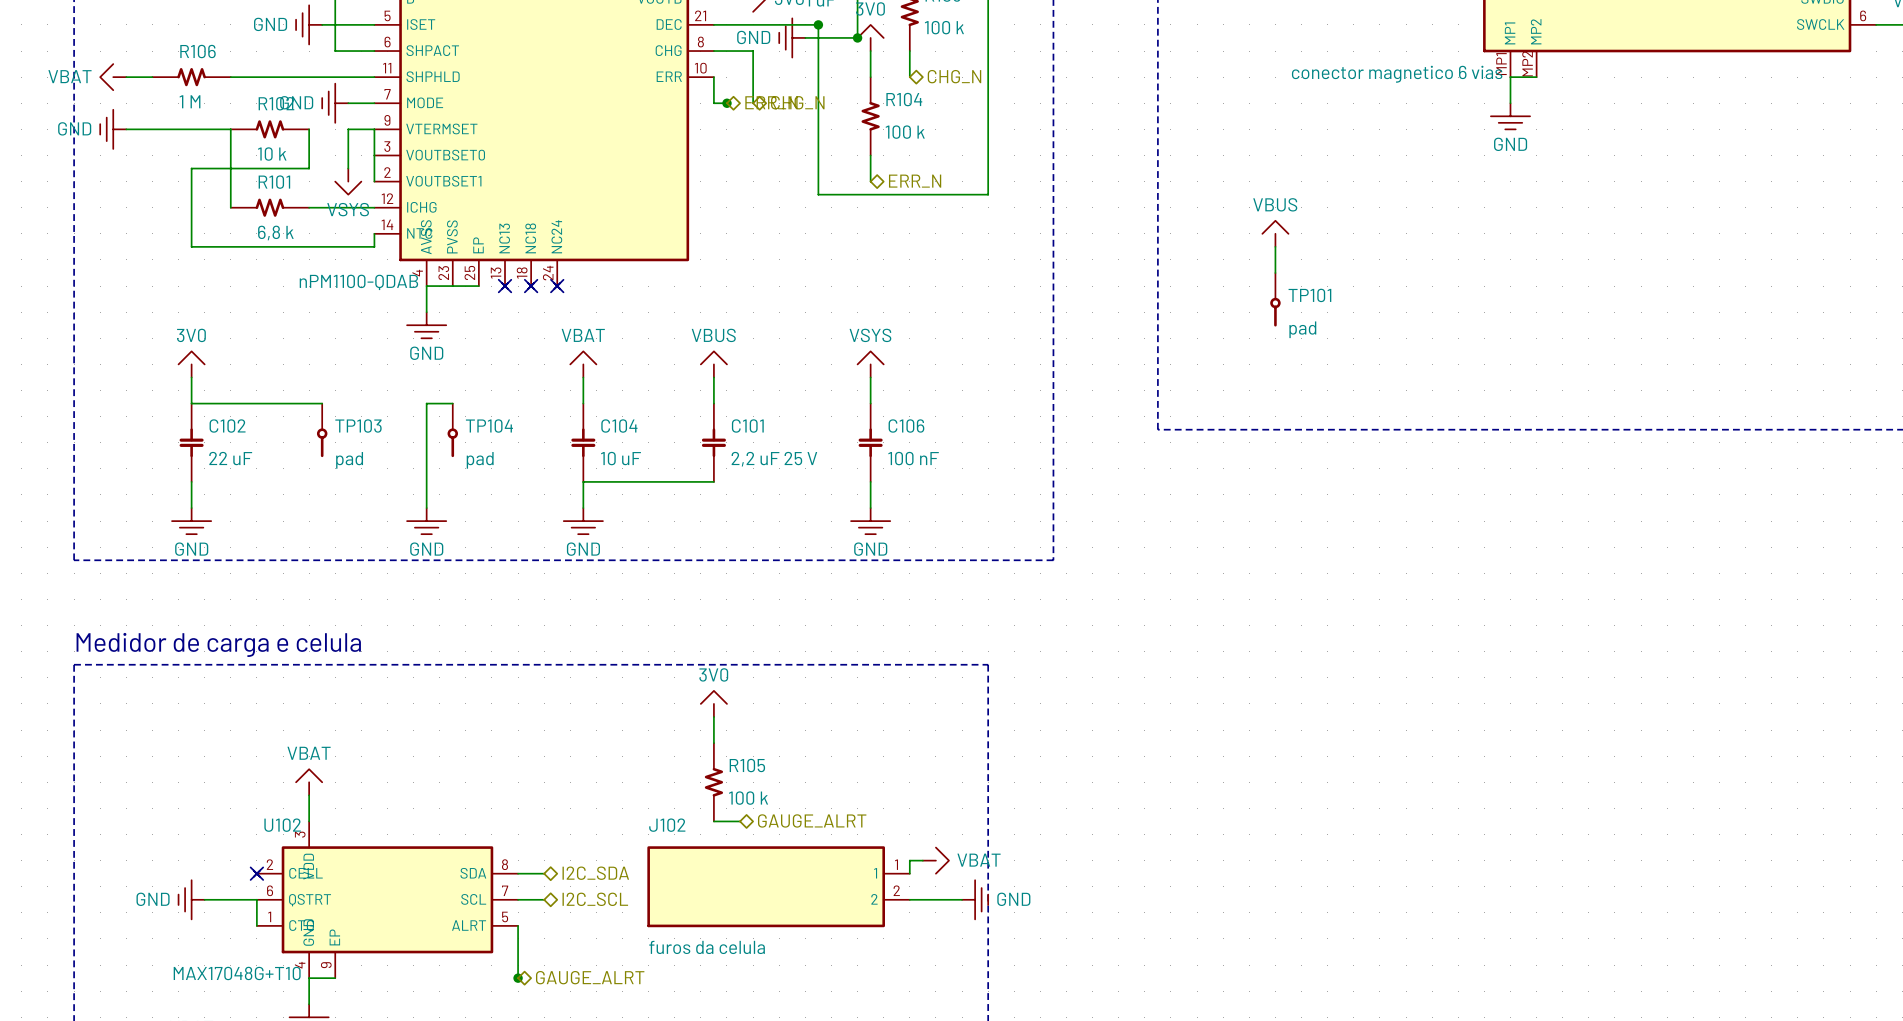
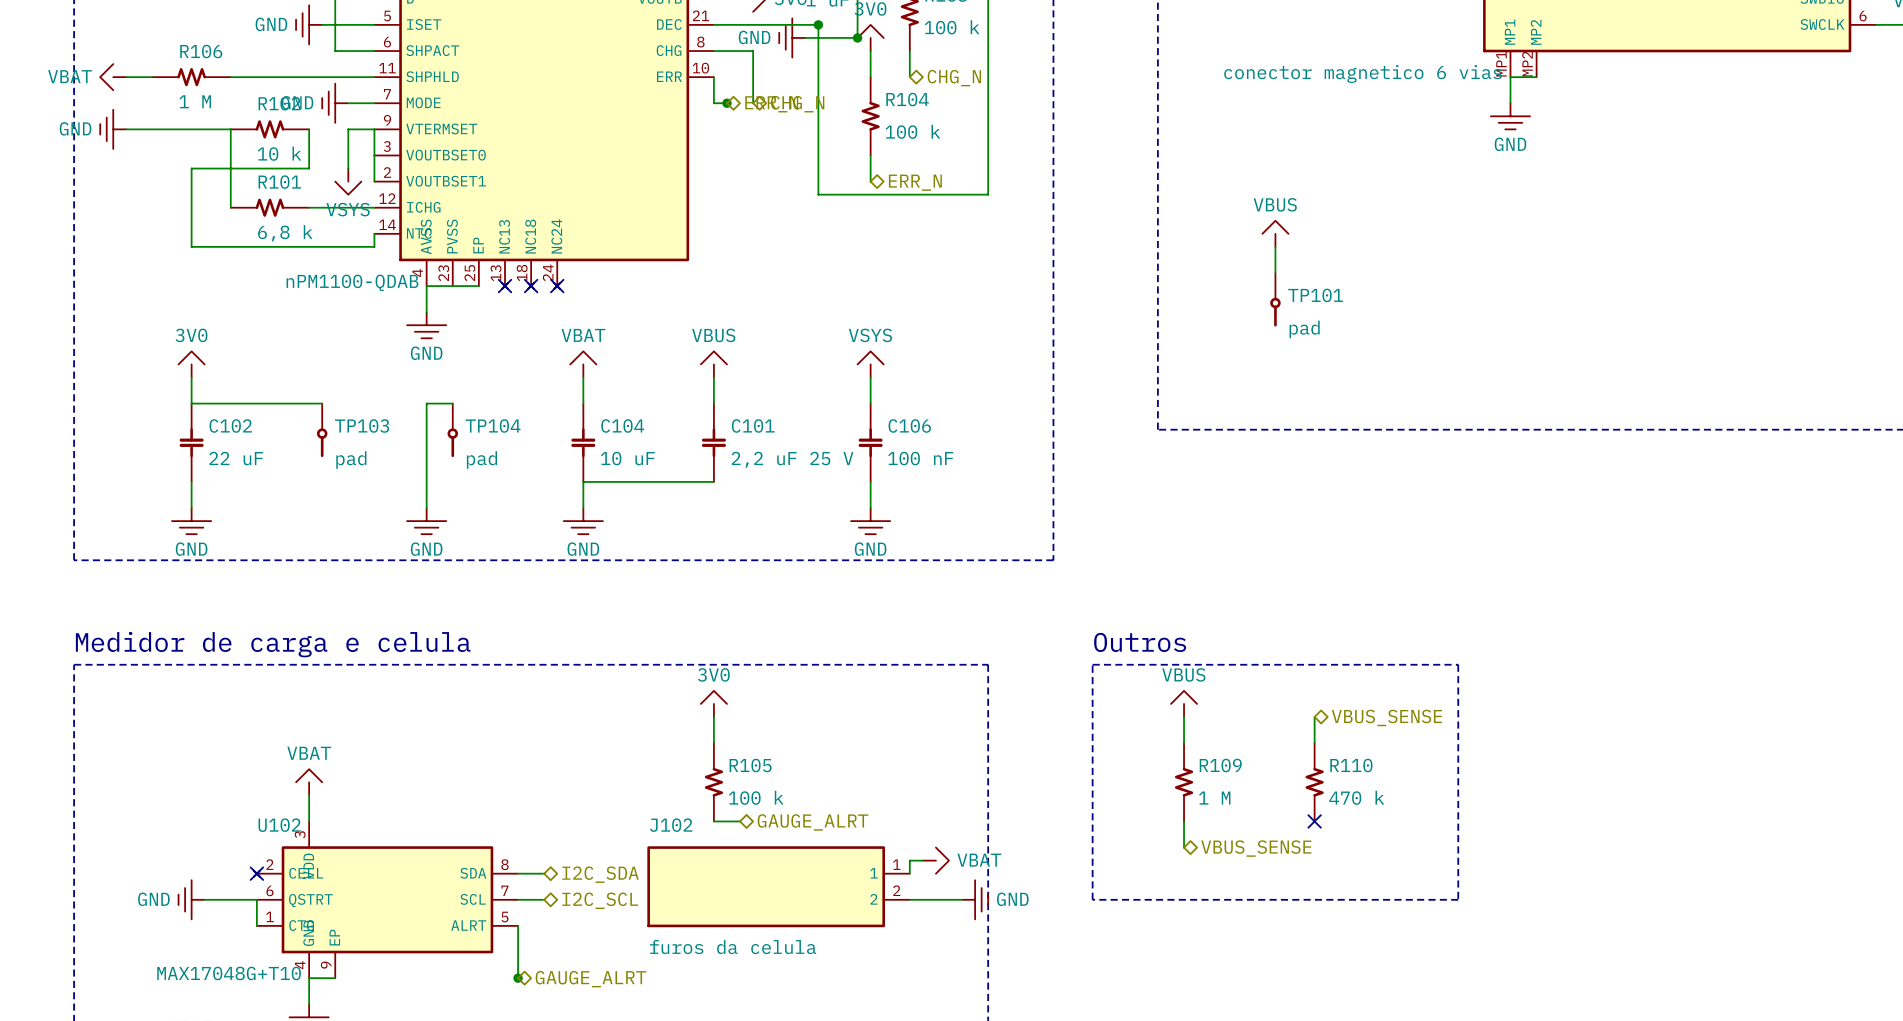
text: none -> Outros (1140, 642)
line: none -> (1092, 664) (1458, 664) (1458, 899) (1092, 899) (1092, 664)
power symbol: none -> VBUS (1184, 703)
wire: none -> (1184, 716) (1184, 743)
wire: none -> (1314, 716) (1314, 743)
hierarchical label: none -> VBUS_SENSE (1386, 717)
R109: none -> 1 M (1184, 782)
R110: none -> 470 k (1314, 782)
wire: none -> (1184, 821) (1184, 847)
no-connect mark: none -> (1314, 821)
hierarchical label: none -> VBUS_SENSE (1256, 848)

